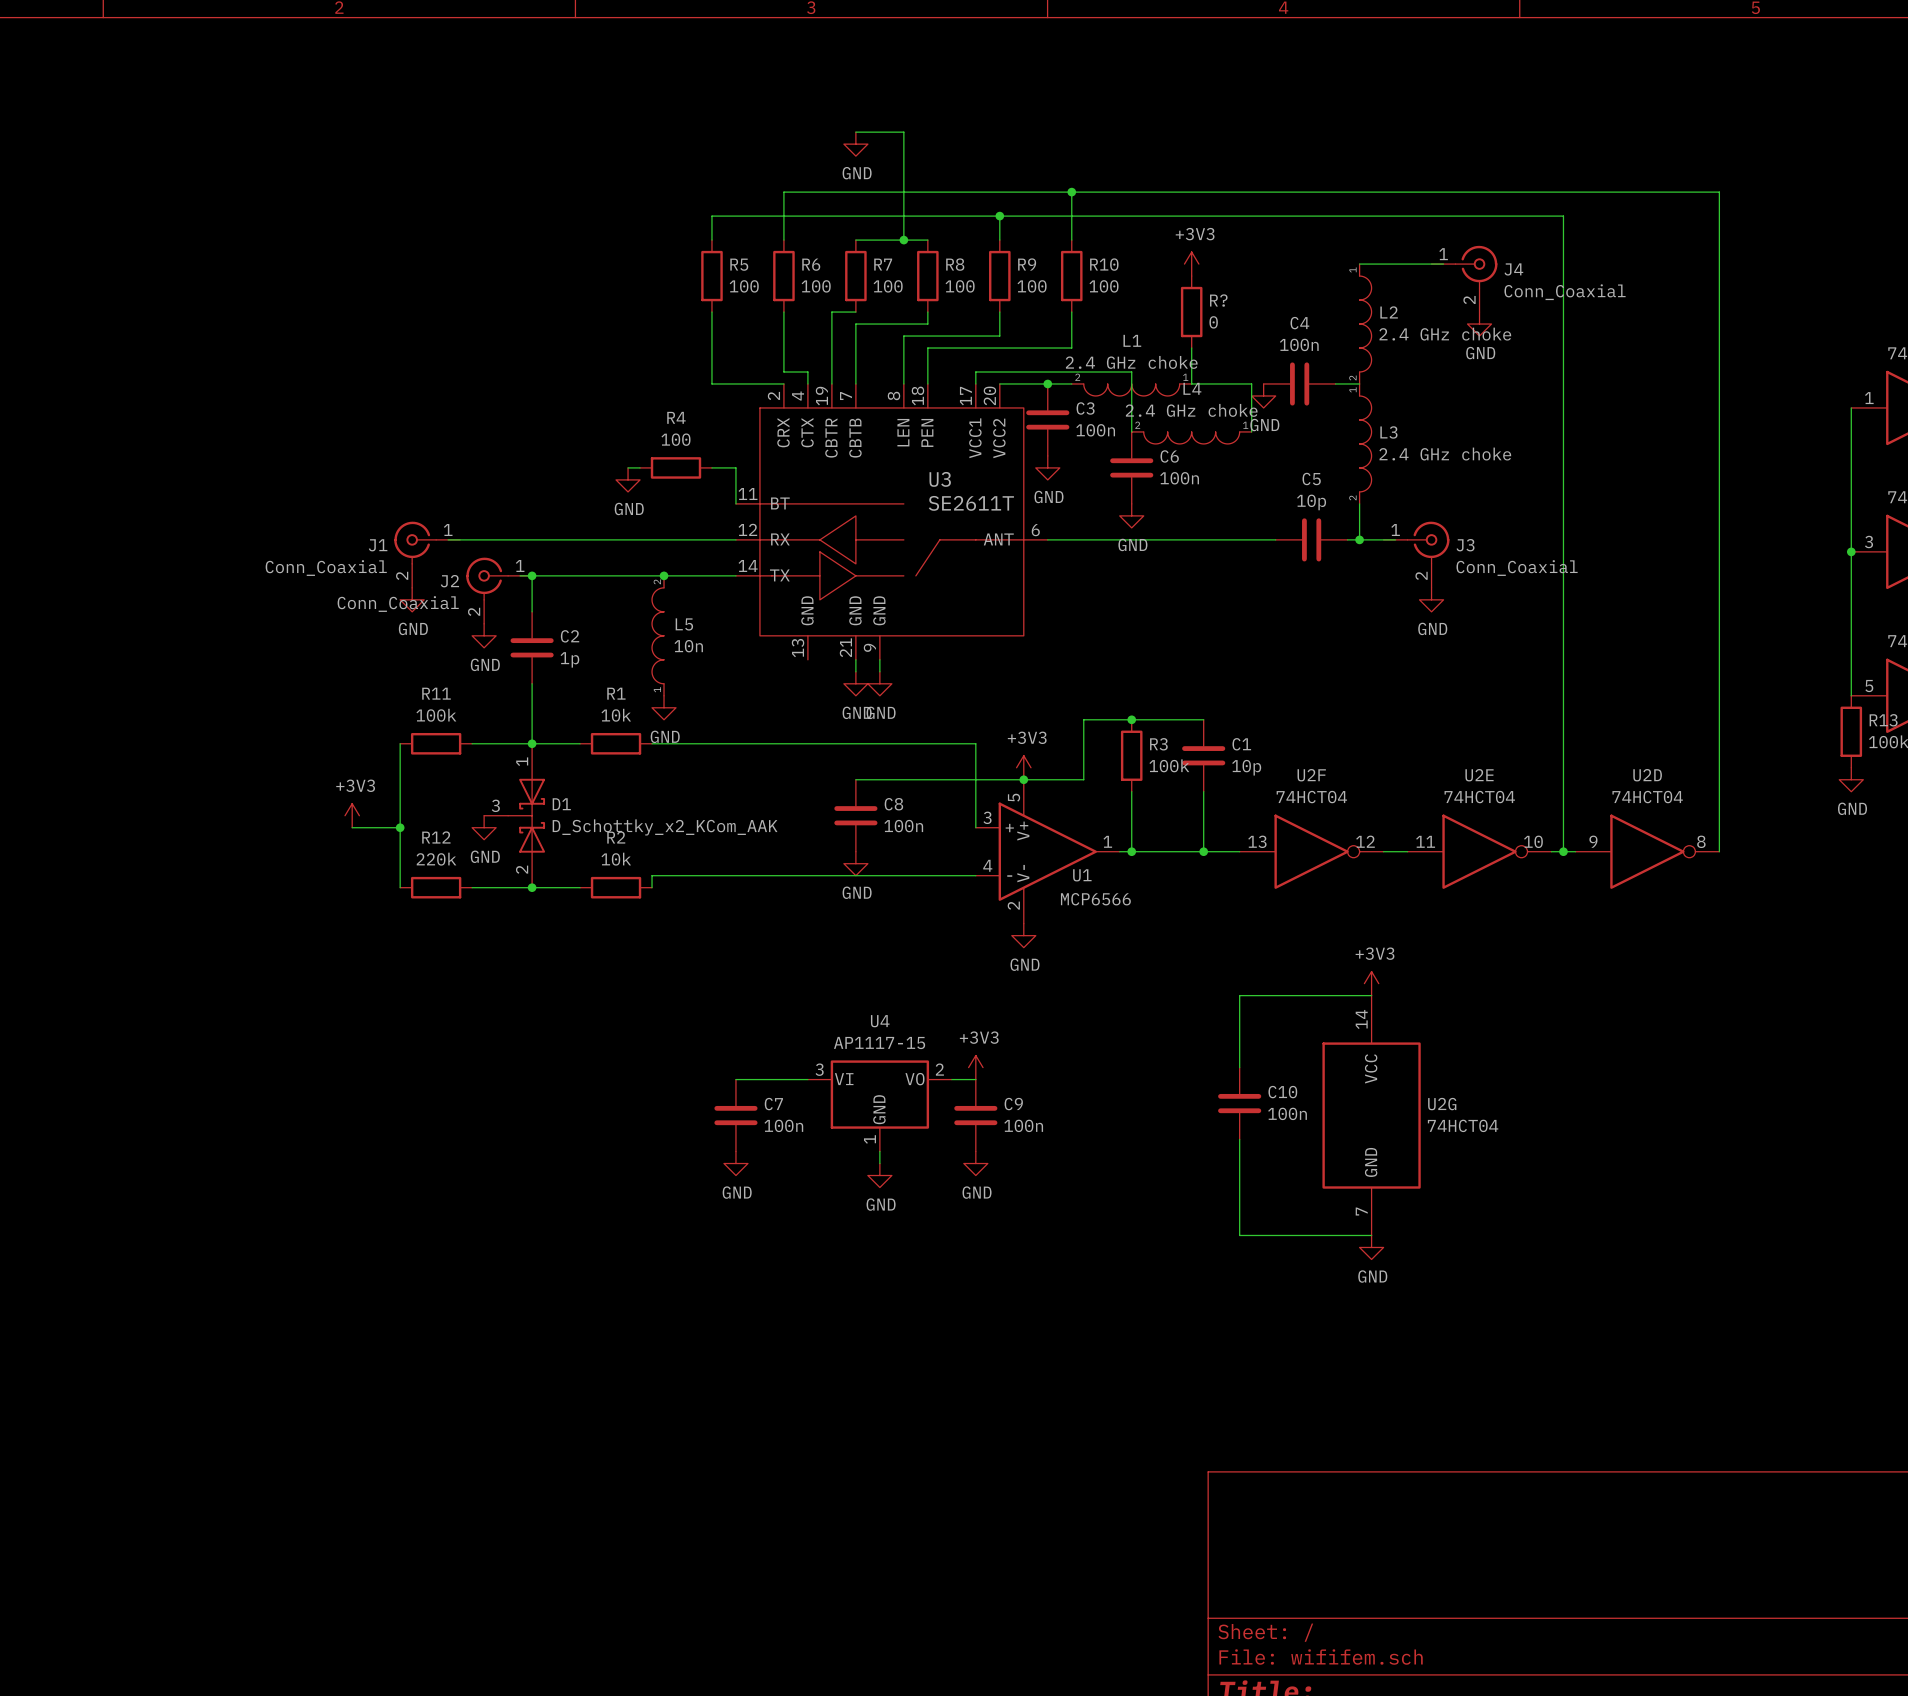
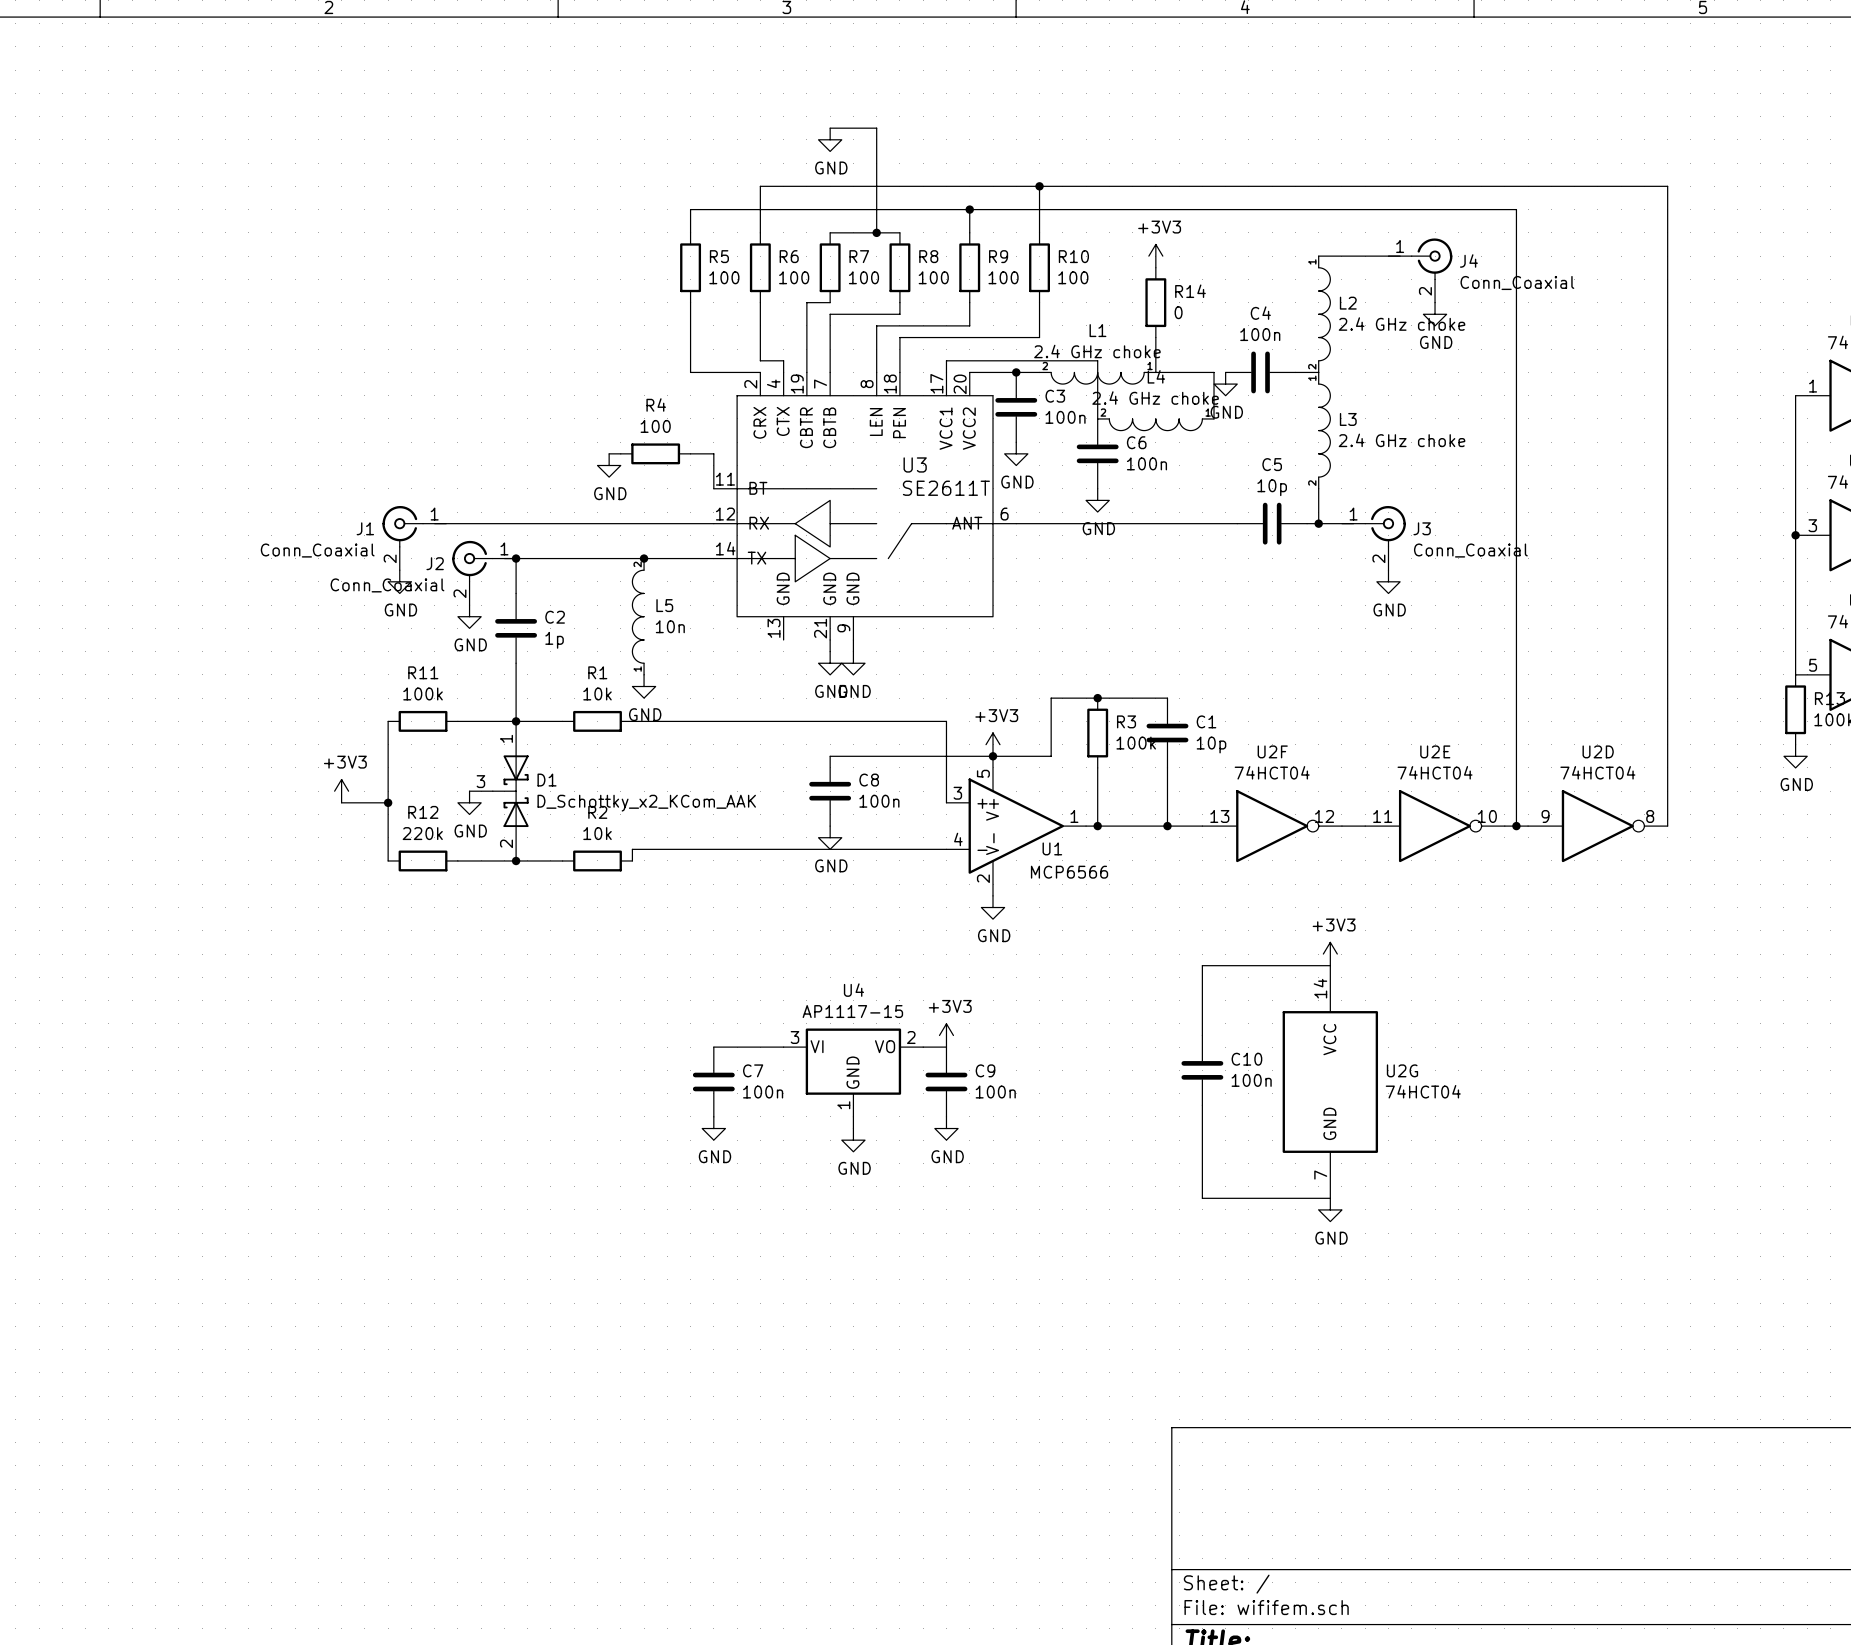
R? name: R? (1218, 300) -> R14 (1190, 291)

